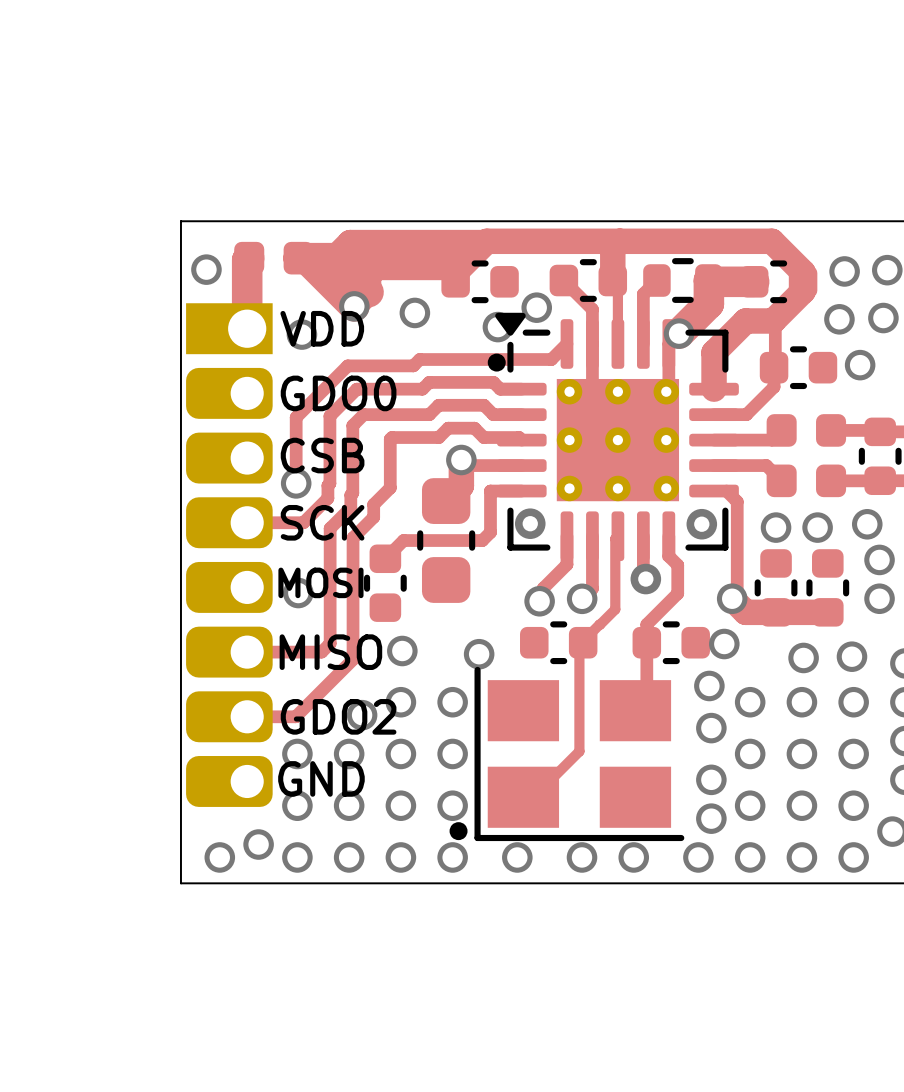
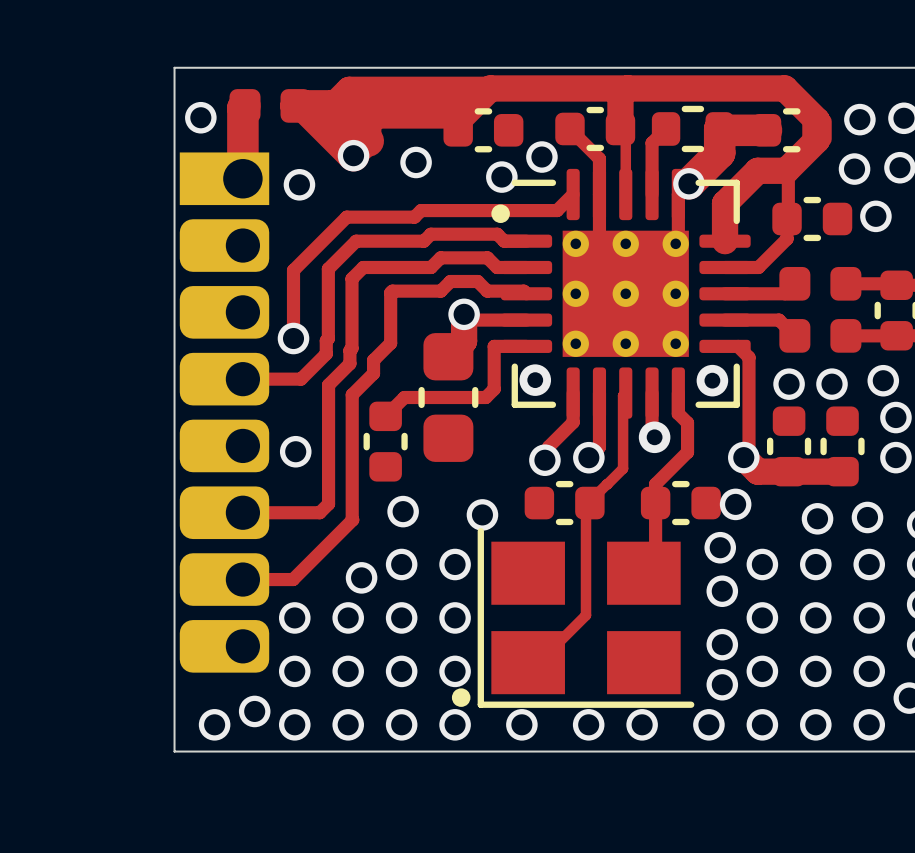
part footprint: [495, 312, 739, 562] -> [500, 168, 751, 419]
text: VDD (322, 328) -> none
text: GDO0 (338, 393) -> none
text: CSB (322, 455) -> none
text: SCK (322, 522) -> none
text: MOSI (320, 582) -> none
text: MISO (330, 652) -> none
text: GDO2 (338, 716) -> none
text: GND (321, 778) -> none

